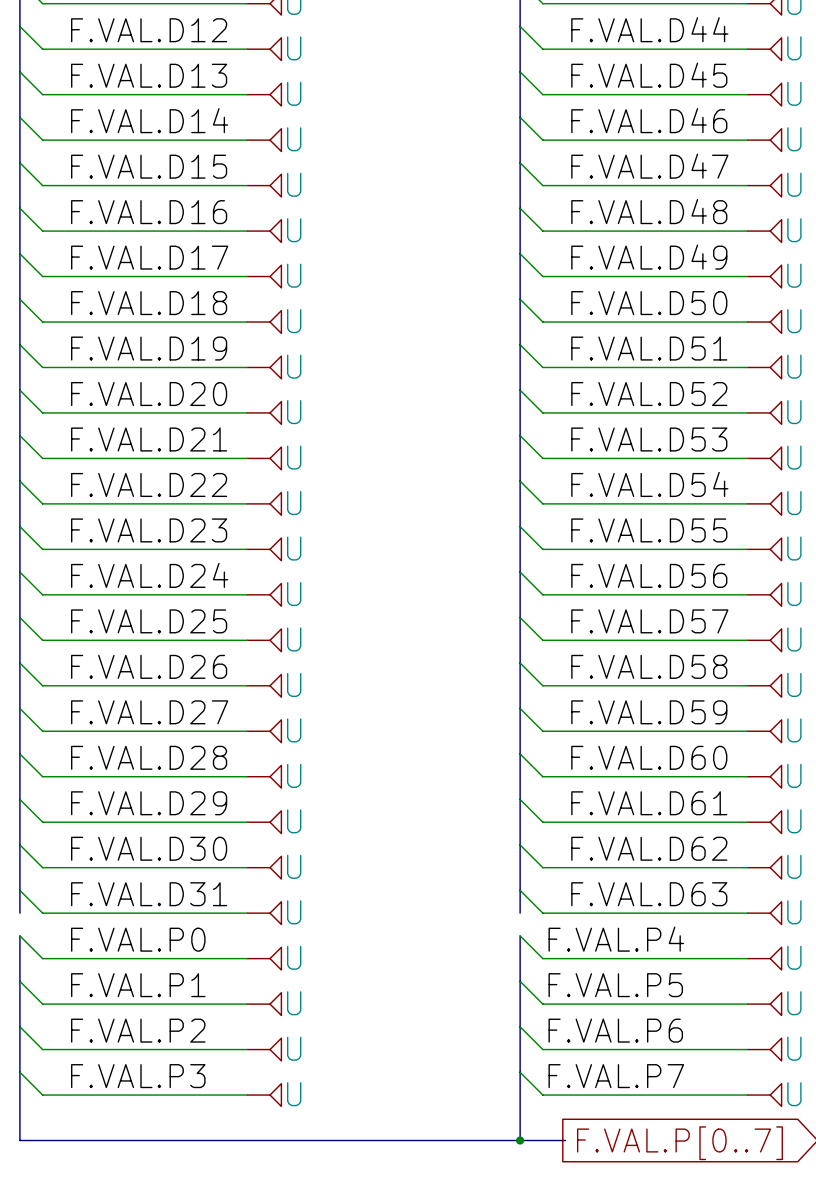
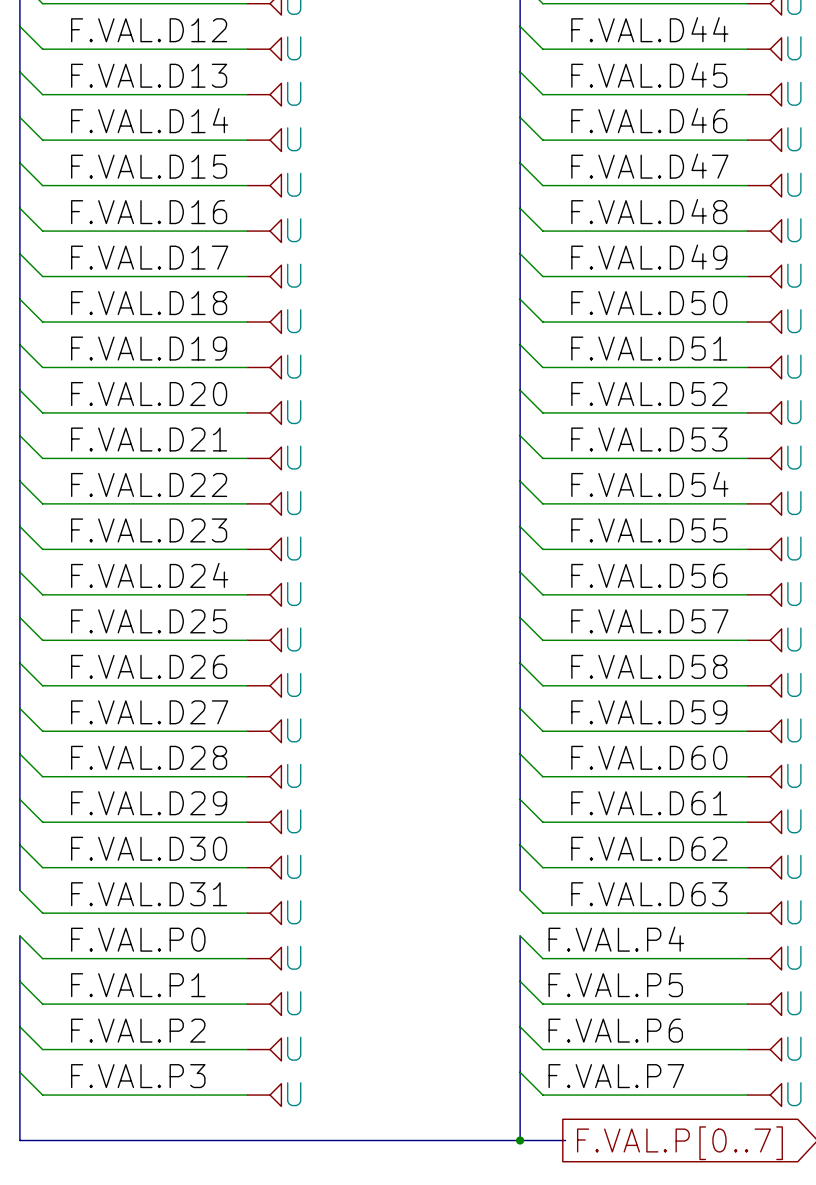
bus: (19, 890) (19, 913) -> none
bus: (520, 890) (520, 913) -> none

